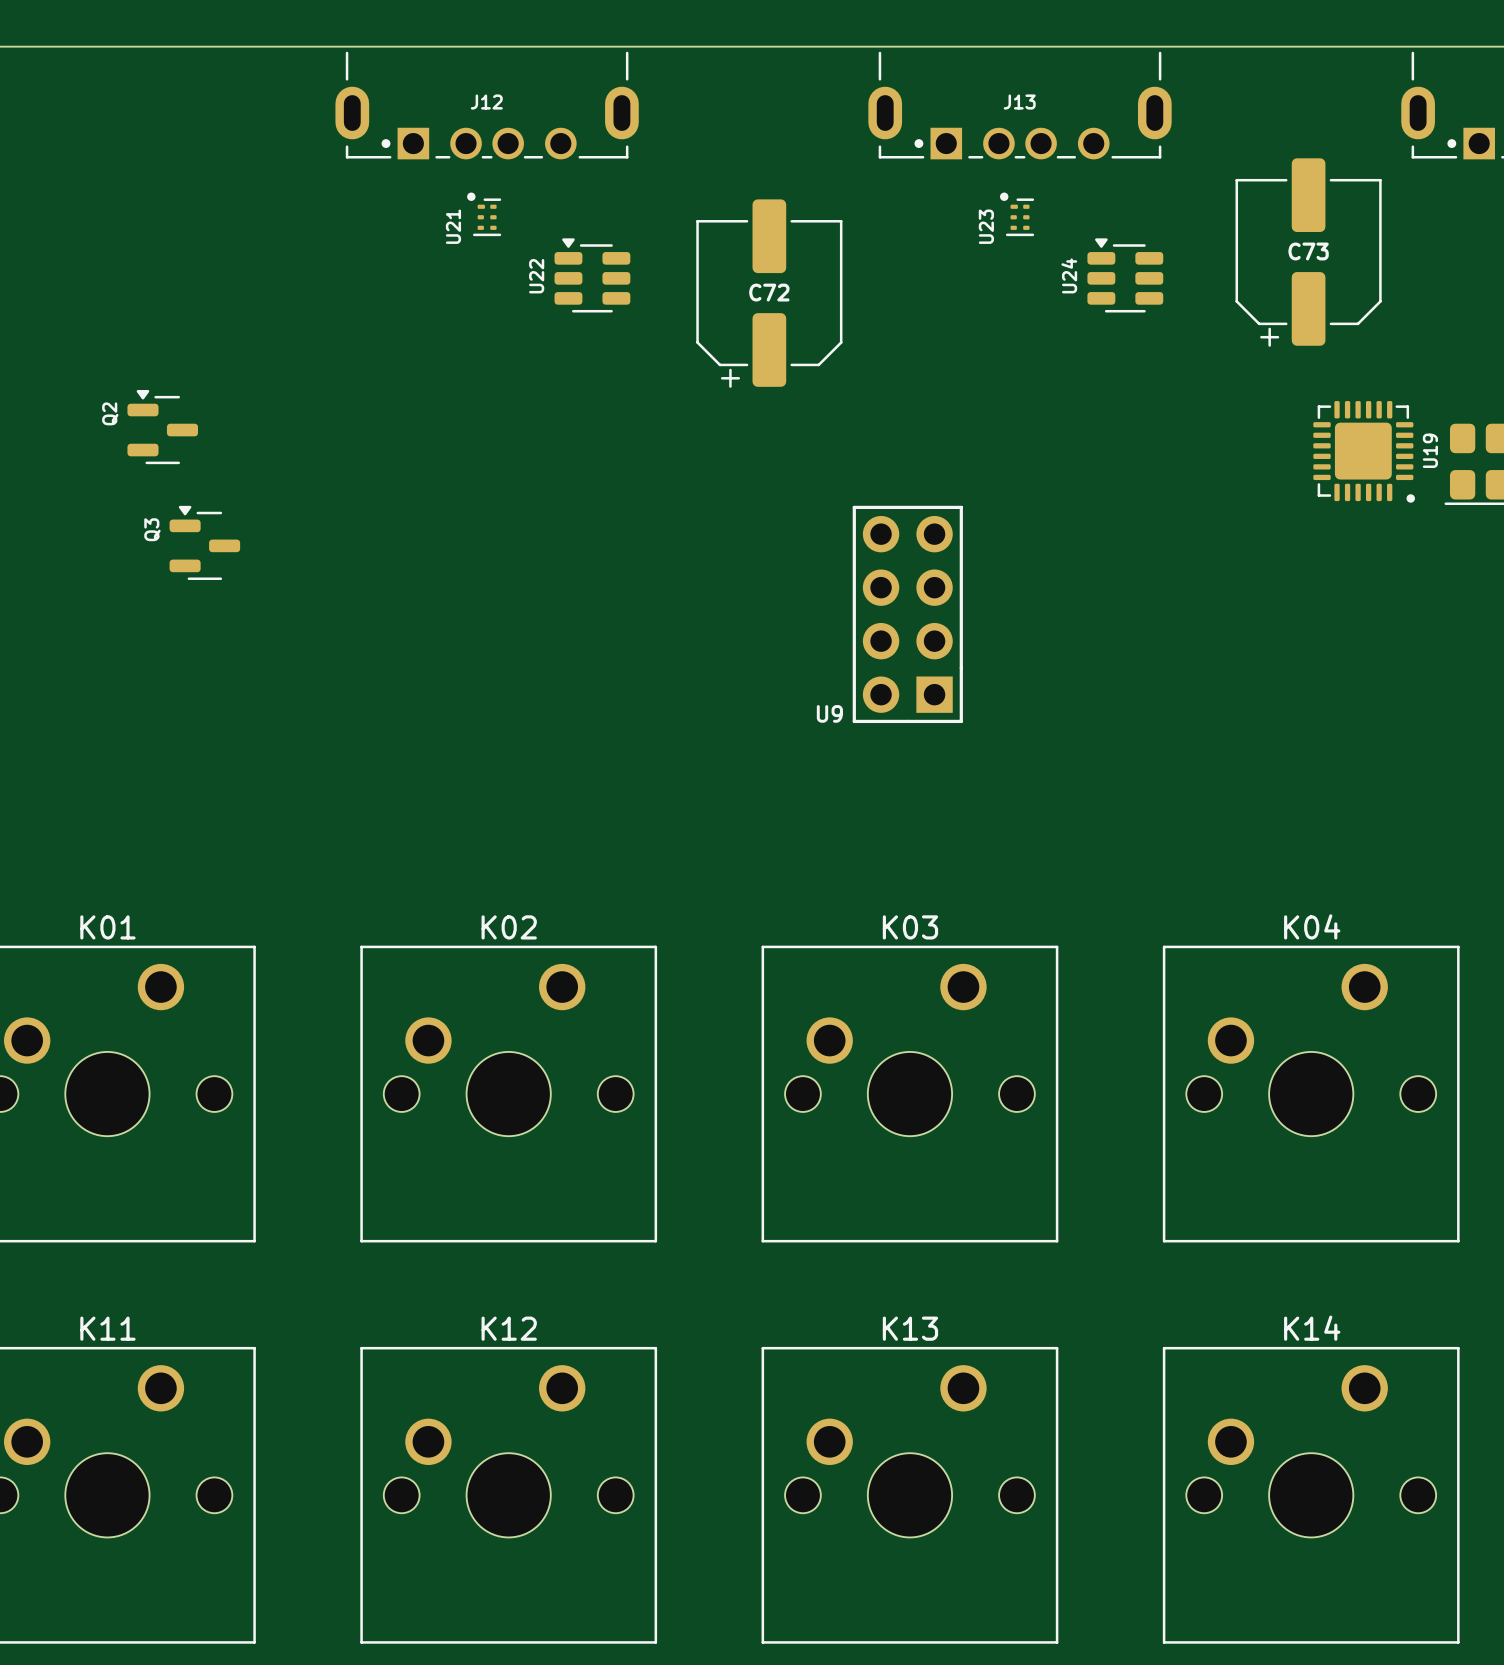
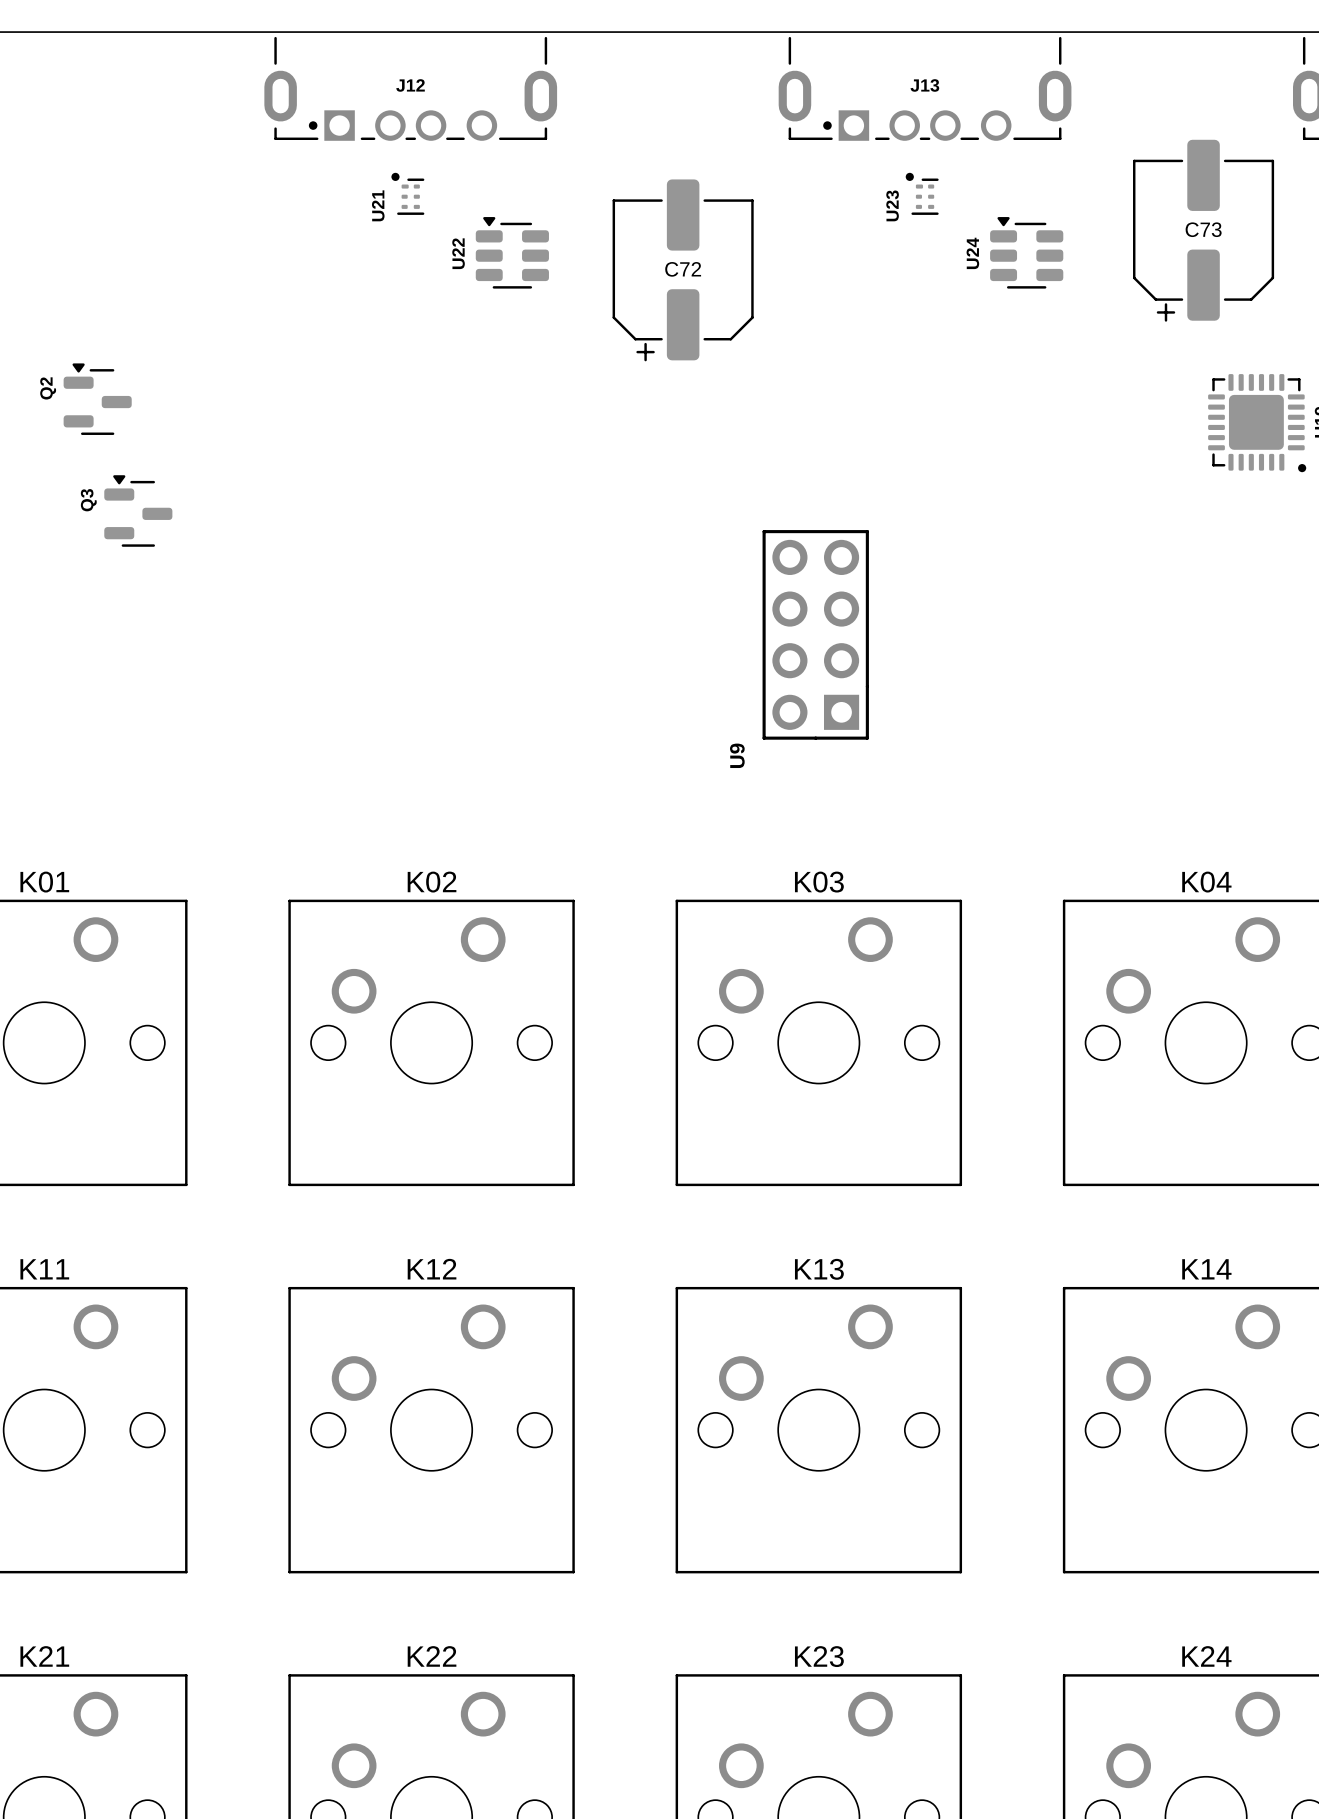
U9 position: (907, 614) -> (815, 634)
U9 name rotation: 0° (829, 713) -> 90° counterclockwise (737, 755)

